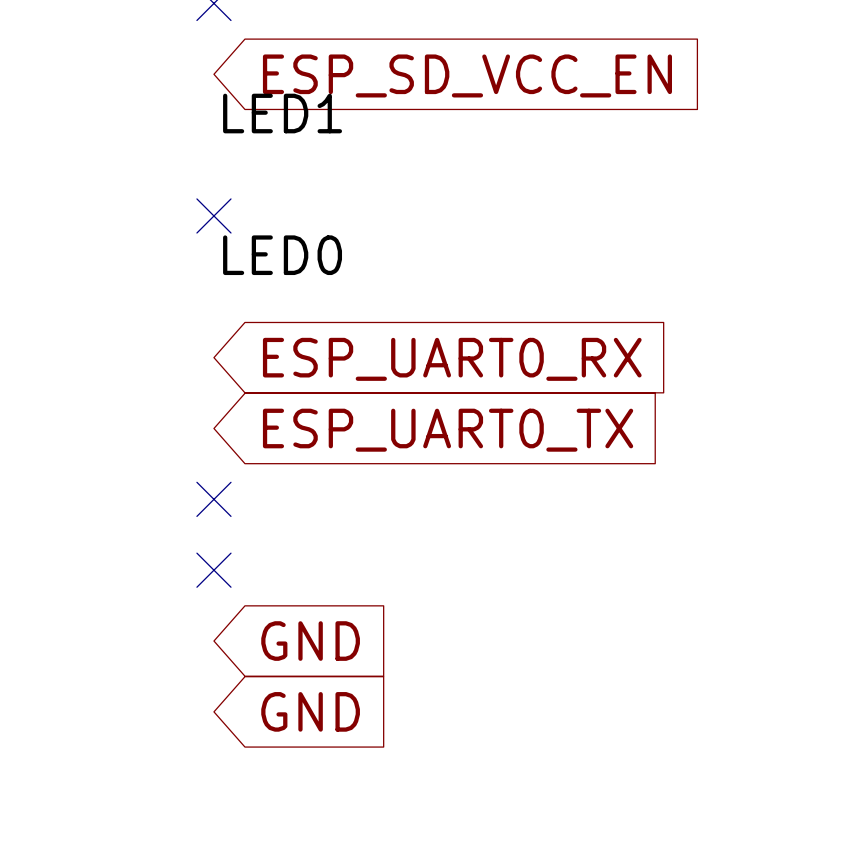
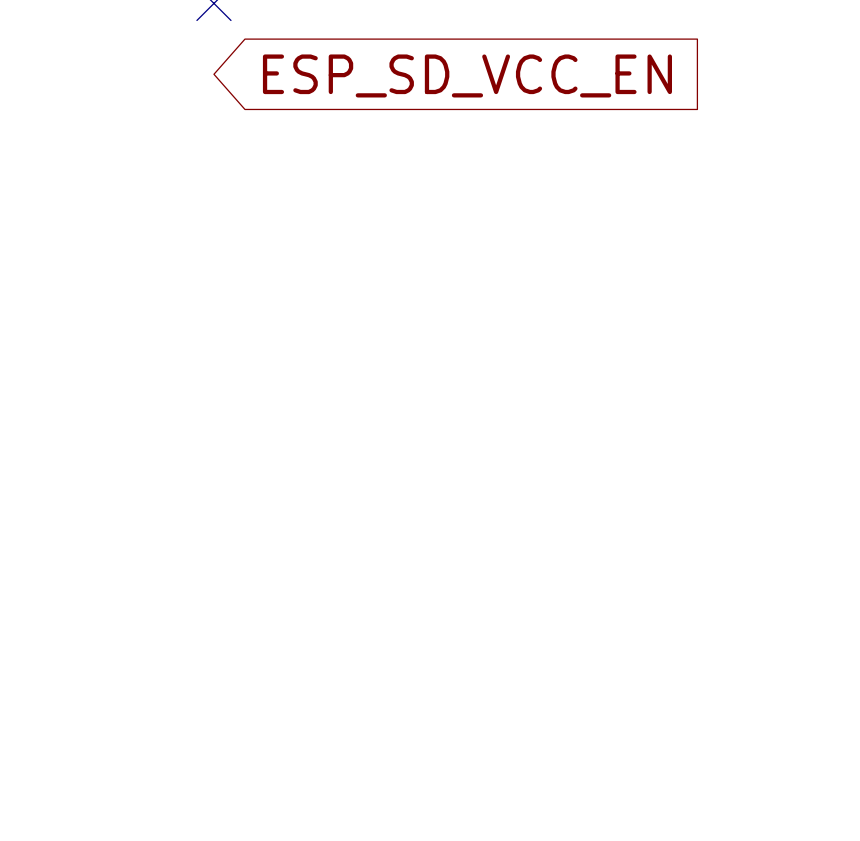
label: LED1 (282, 113) -> none
no-connect mark: (213, 215) -> none
label: LED0 (282, 255) -> none
global label: ESP_UART0_RX (452, 359) -> none
global label: ESP_UART0_TX (448, 430) -> none
no-connect mark: (213, 499) -> none
no-connect mark: (213, 570) -> none
global label: GND (310, 641) -> none
global label: GND (310, 711) -> none

